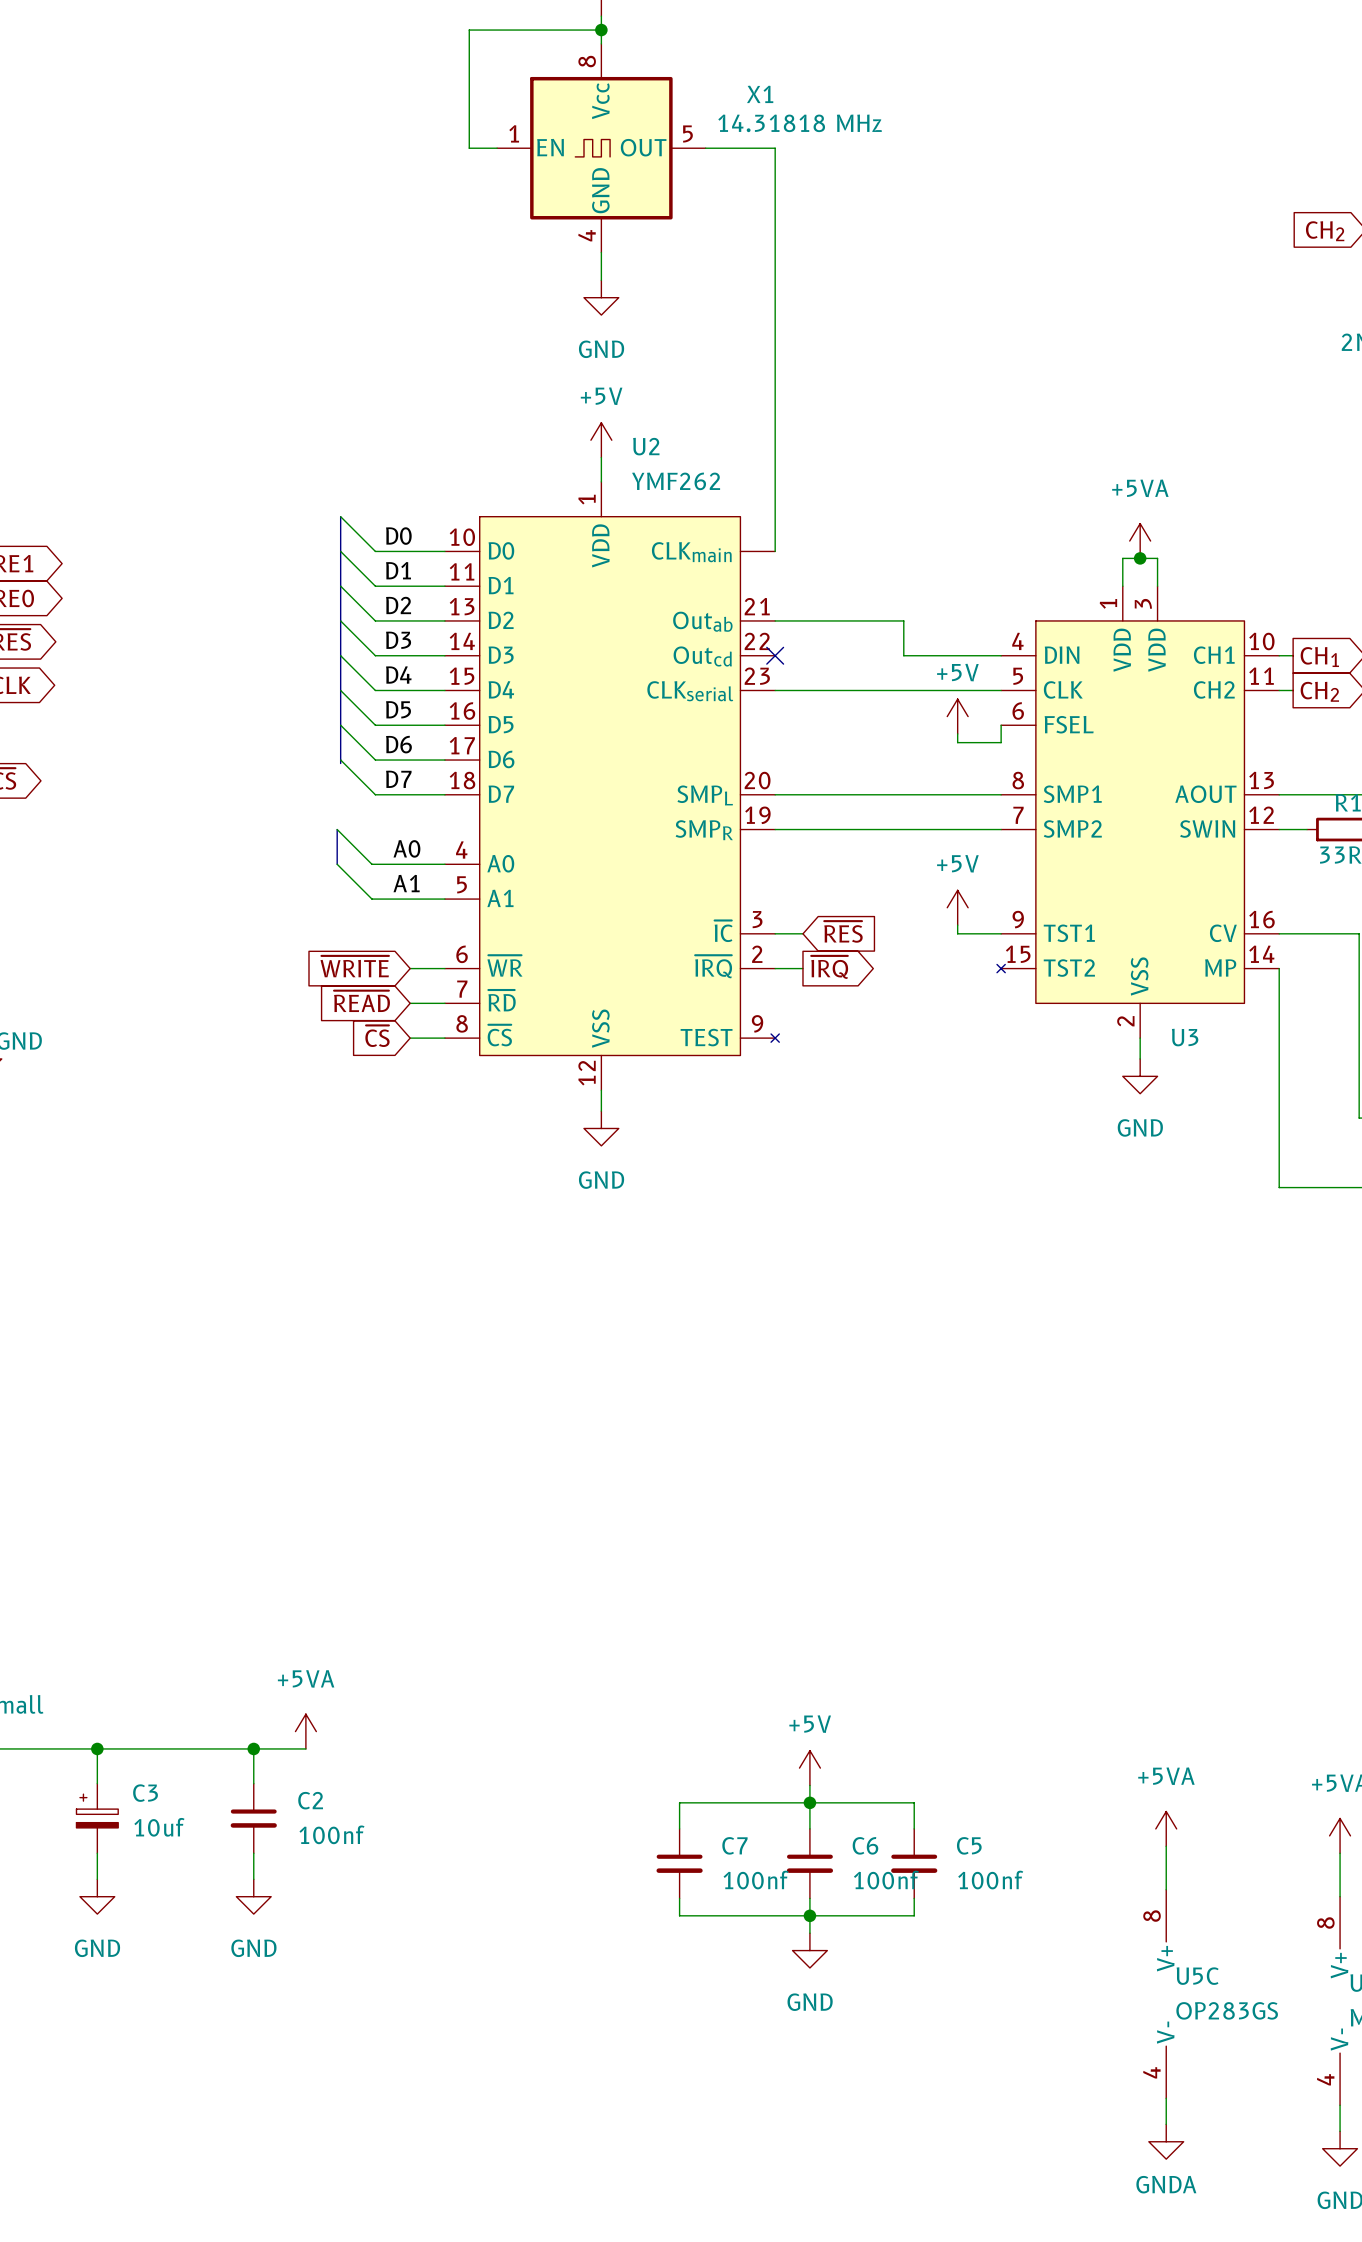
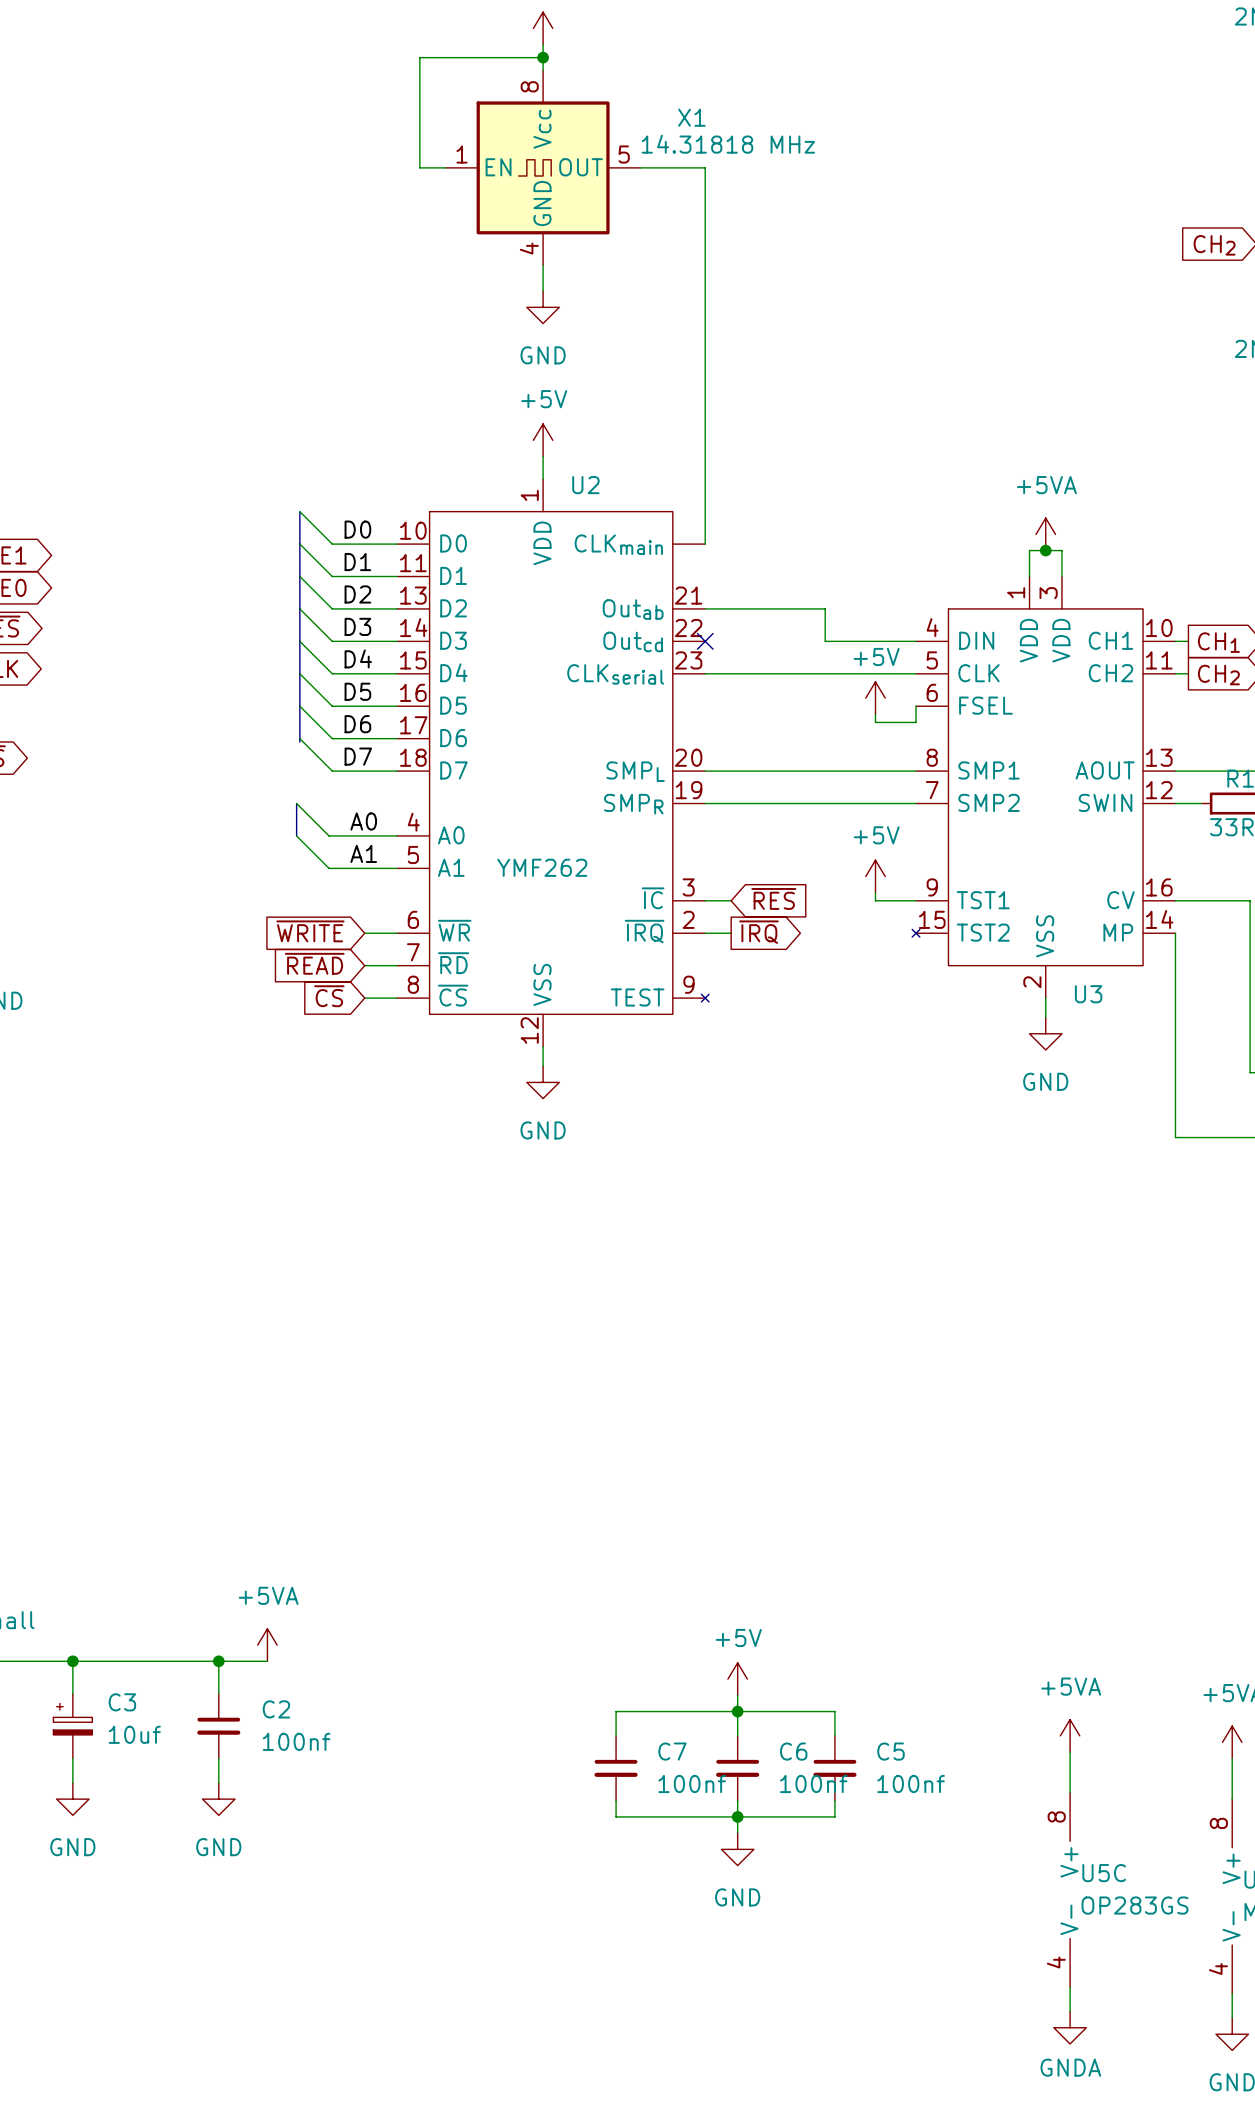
U2 name position: U2 (646, 446) -> U2 (585, 485)
U2 symbol: [444, 481, 780, 1091] -> [397, 479, 710, 1047]
U2 value position: YMF262 (676, 481) -> YMF262 (542, 867)
U3 symbol: [997, 586, 1280, 1039] -> [912, 576, 1176, 999]

